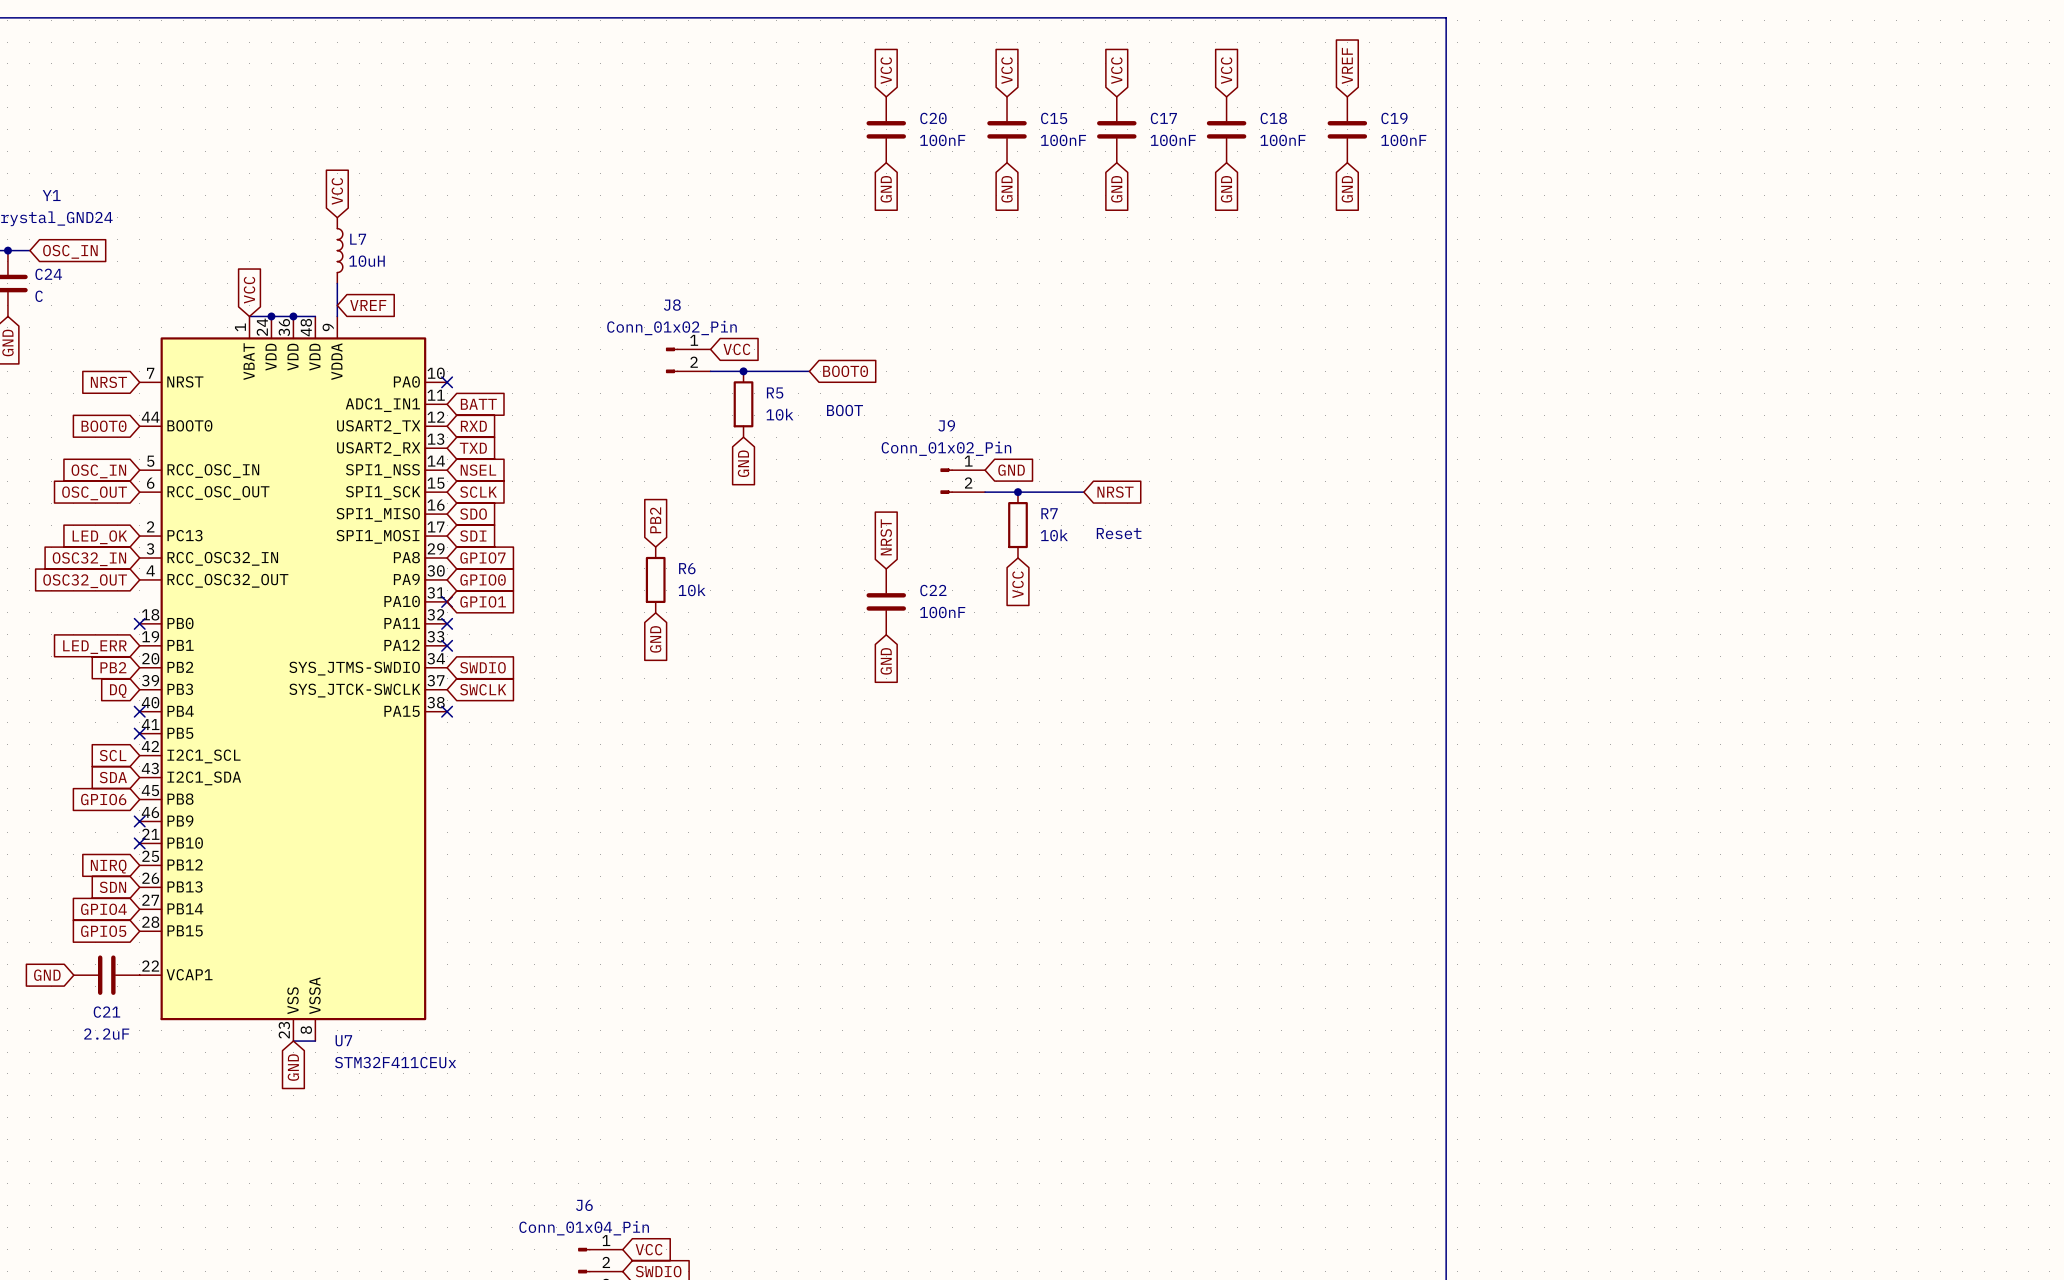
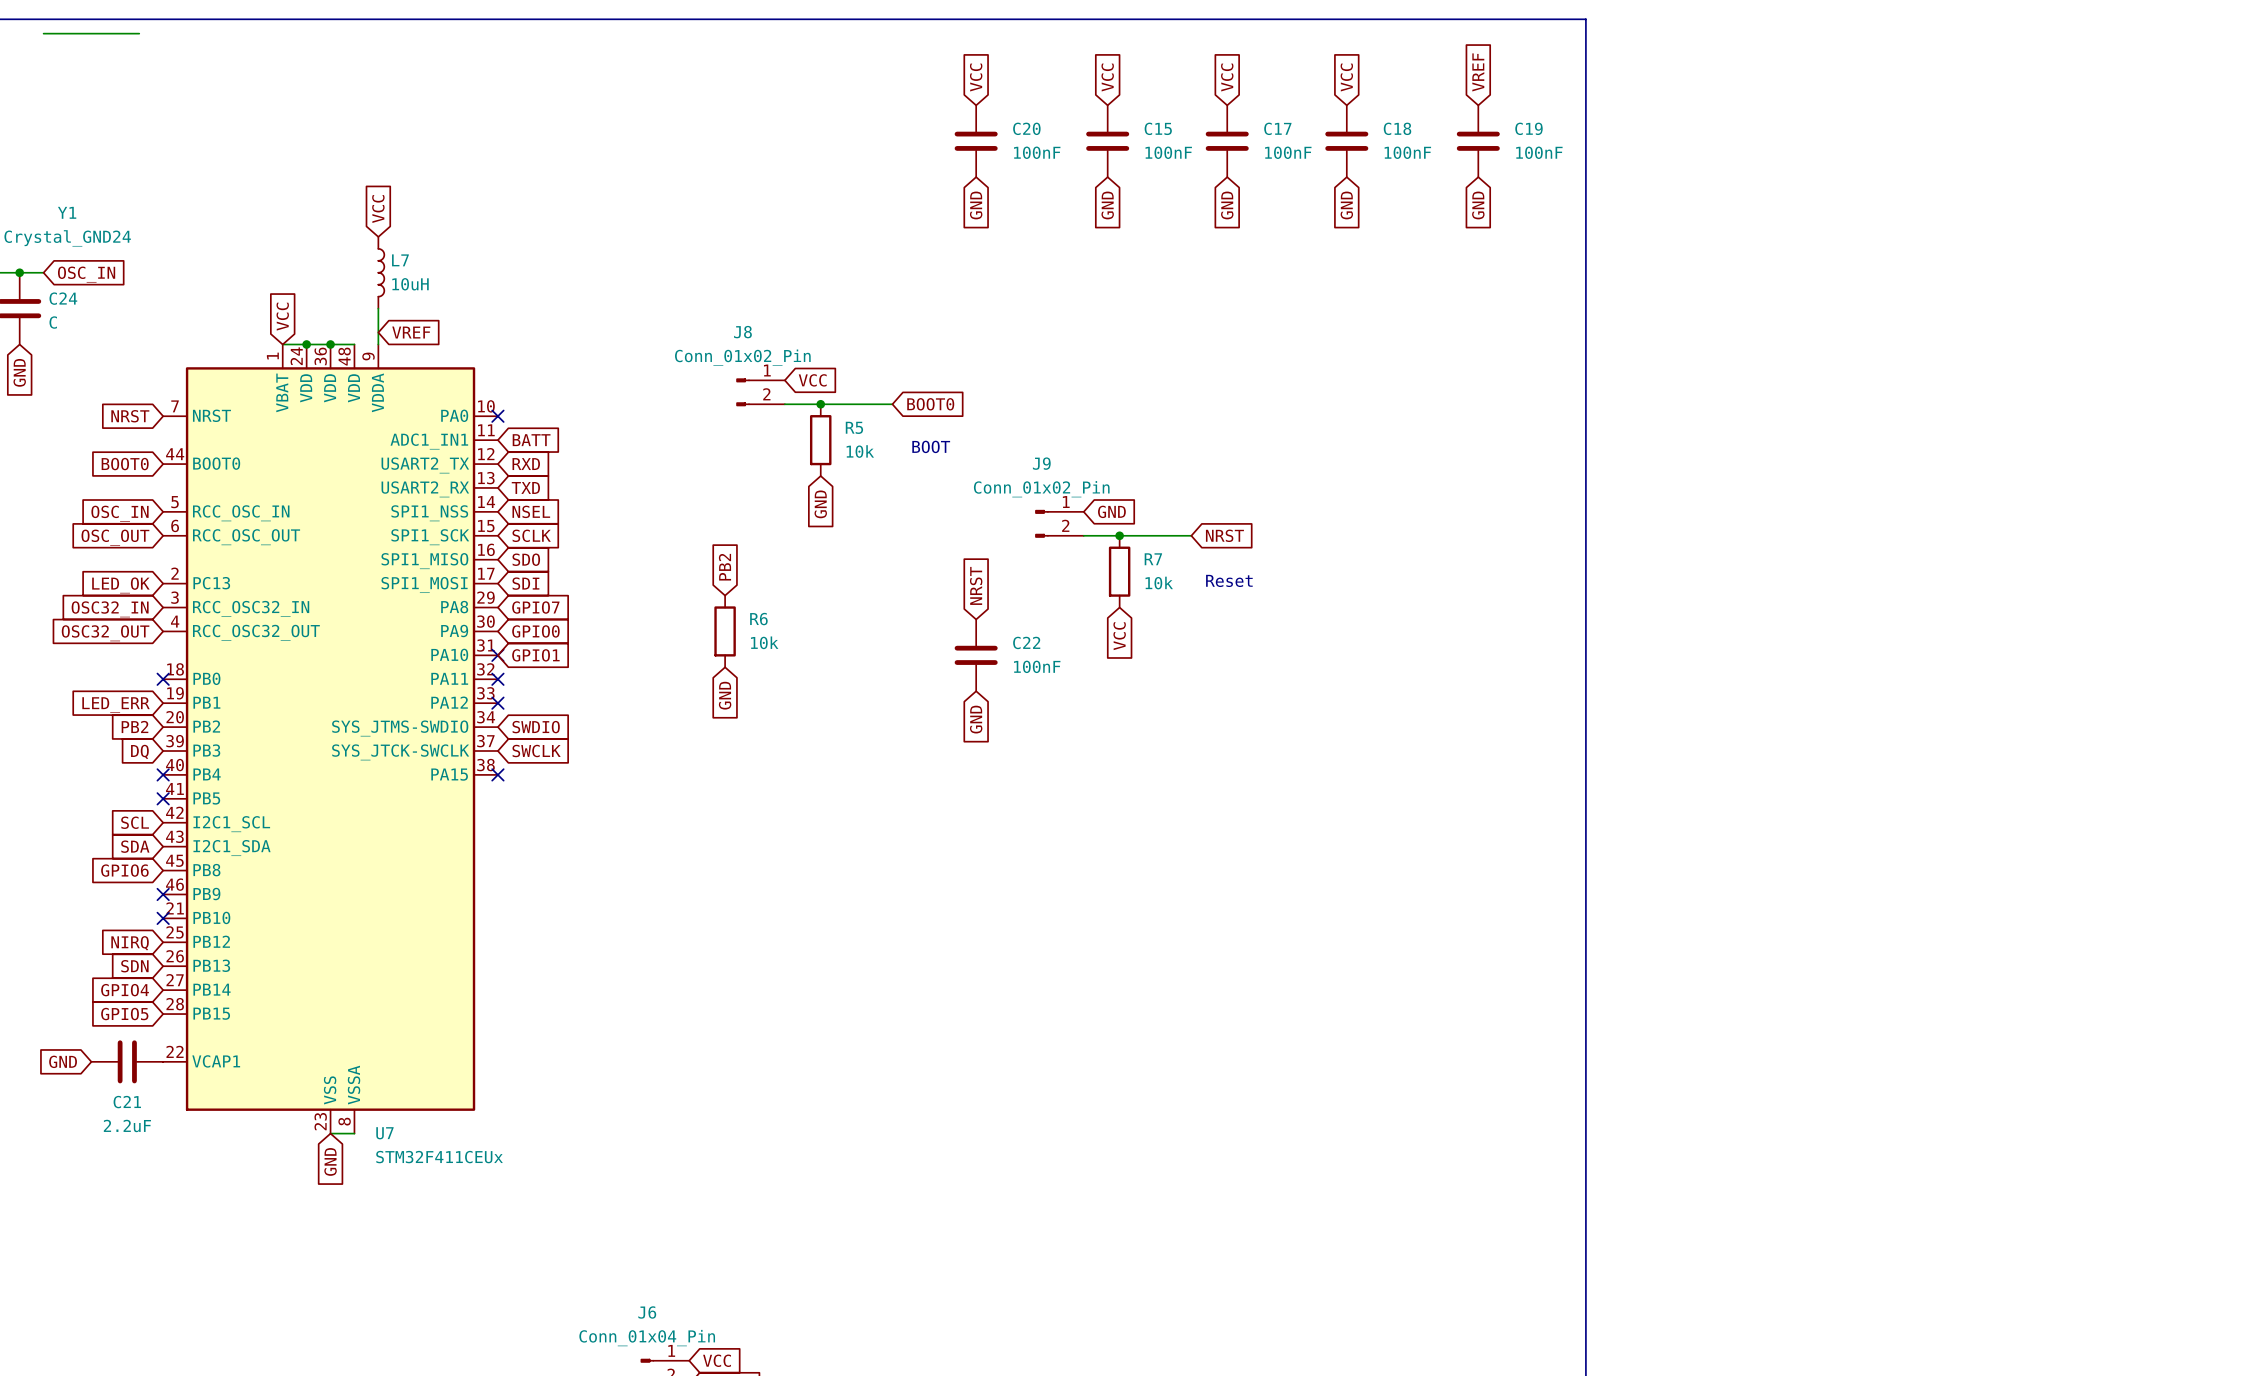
wire: none -> (43, 33) (139, 33)

